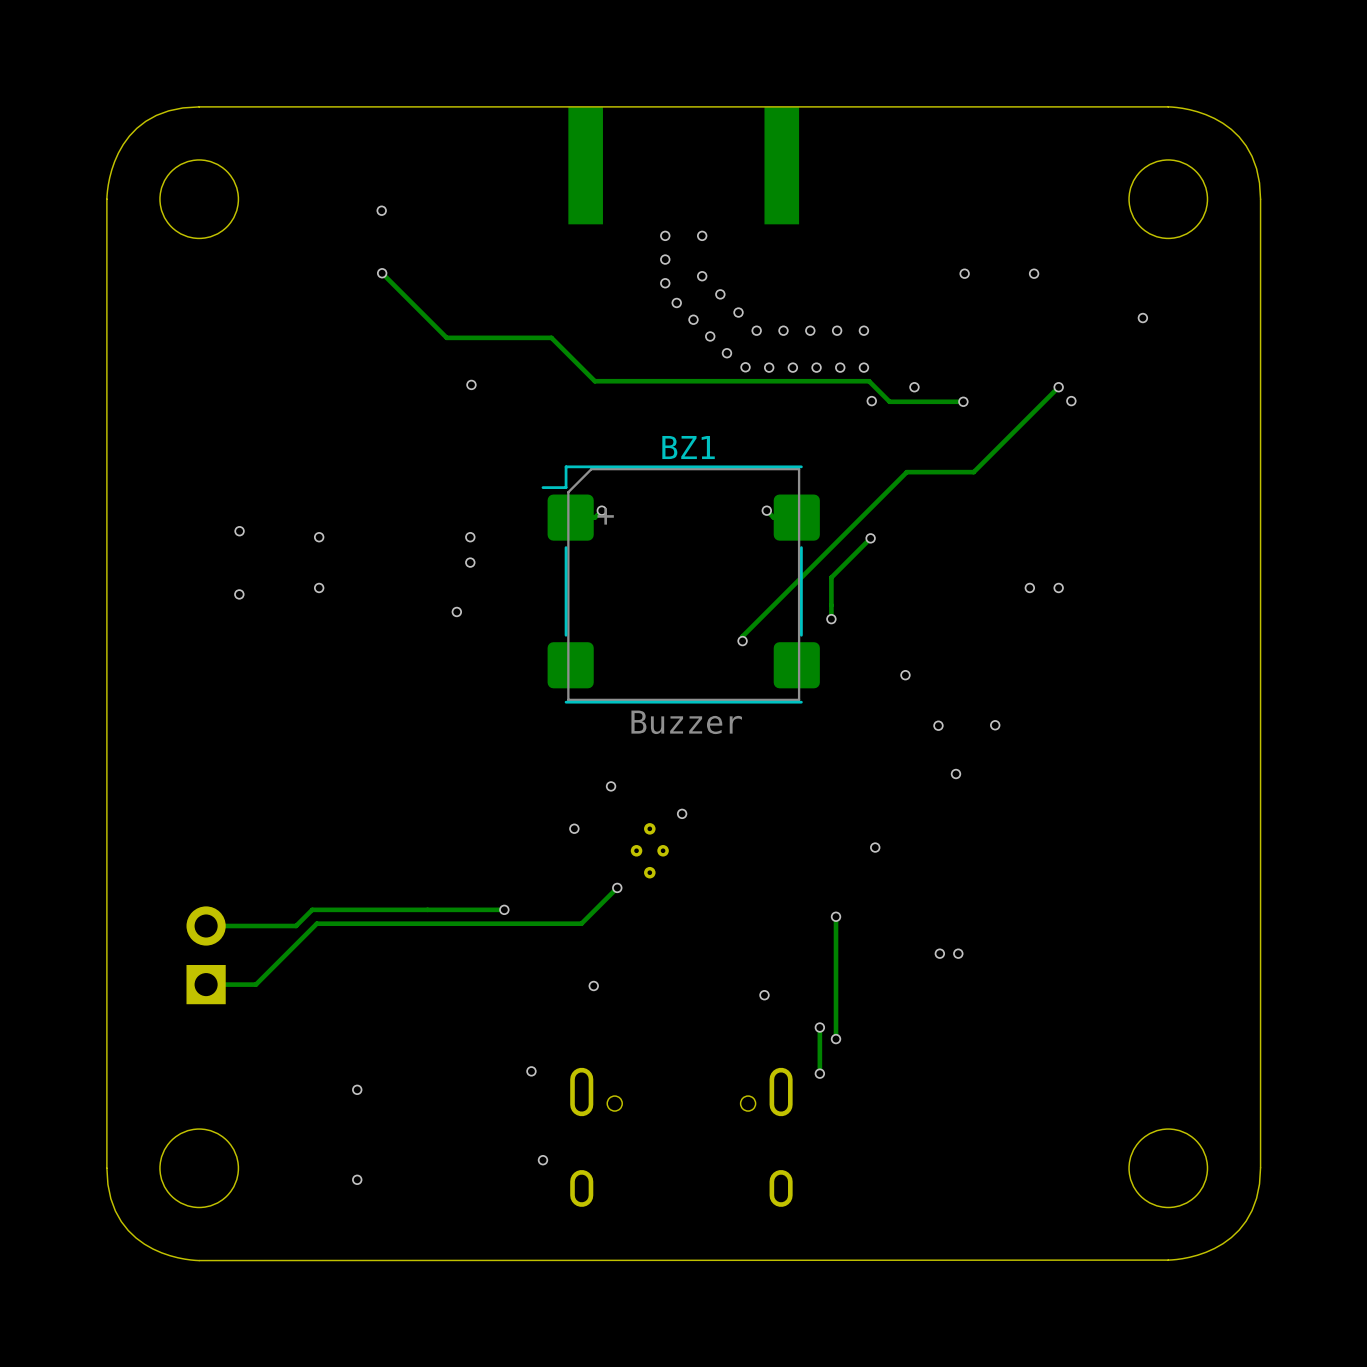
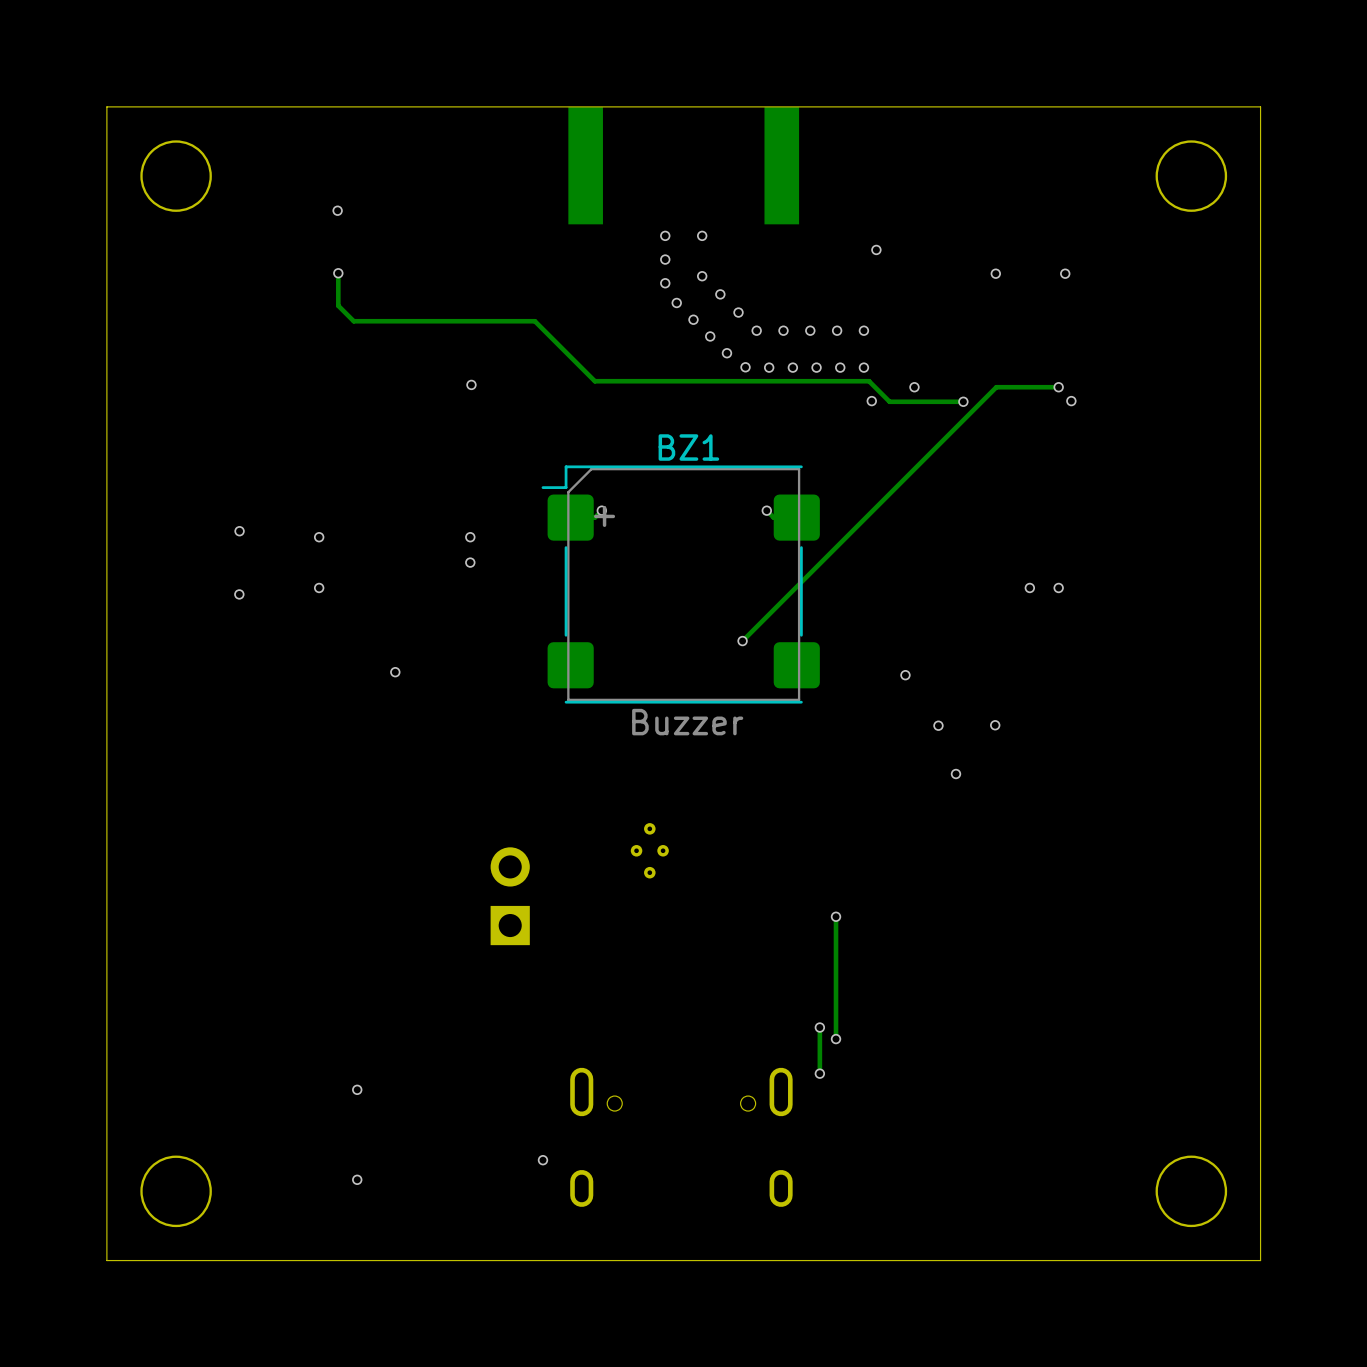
board edge: (199, 106) (168, 110) (156, 115) (136, 128) (123, 144) (114, 161) (109, 177) (106, 199) -> (199, 106) (106, 106) (106, 199)
board edge: (1168, 106) (1189, 109) (1205, 114) (1223, 123) (1239, 136) (1252, 156) (1256, 168) (1260, 199) -> (1168, 106) (1260, 106) (1260, 199)
round board edge: none -> [140, 140, 212, 212]
round board edge: none -> [1155, 140, 1228, 212]
round board edge: [159, 159, 239, 239] -> none
round board edge: [1128, 159, 1209, 239] -> none
via: none -> (337, 210)
via: (381, 210) -> none
via: none -> (876, 249)
via: none -> (338, 273)
track: (382, 273) (446, 337) (551, 337) -> (338, 273) (338, 305) (353, 321) (534, 321) (551, 337)
via: (382, 273) -> none
via: (964, 273) -> none
via: none -> (995, 273)
via: (1034, 273) -> none
via: none -> (1065, 273)
via: (1142, 318) -> none
track: (1058, 387) (973, 472) (906, 472) (742, 636) (742, 641) -> (1058, 387) (996, 387) (742, 641)
track: (870, 538) (831, 577) (831, 619) -> none
via: (870, 538) -> none
via position: (456, 611) -> (395, 672)
via: (831, 619) -> none
via: (611, 786) -> none
via: (682, 813) -> none
via: (574, 828) -> none
via: (875, 847) -> none
track: (617, 887) (581, 923) (316, 923) (255, 984) (206, 984) -> none
via: (617, 887) -> none
track: (504, 909) (312, 909) (296, 925) (206, 925) -> none
via: (504, 909) -> none
via: (939, 953) -> none
via: (958, 953) -> none
part position: (206, 955) -> (510, 896)
via: (593, 985) -> none
via: (764, 995) -> none
via: (531, 1071) -> none
round board edge: [159, 1128, 239, 1209] -> none
round board edge: [1128, 1128, 1209, 1209] -> none
round board edge: none -> [140, 1155, 212, 1228]
round board edge: none -> [1155, 1155, 1228, 1228]
board edge: (1260, 1167) (1256, 1198) (1252, 1210) (1239, 1230) (1214, 1248) (1197, 1255) (1172, 1259) (199, 1260) (177, 1257) (161, 1252) (144, 1244) (128, 1230) (115, 1211) (110, 1198) (106, 1168) -> (1260, 1167) (1260, 1260) (106, 1260) (106, 1168)

